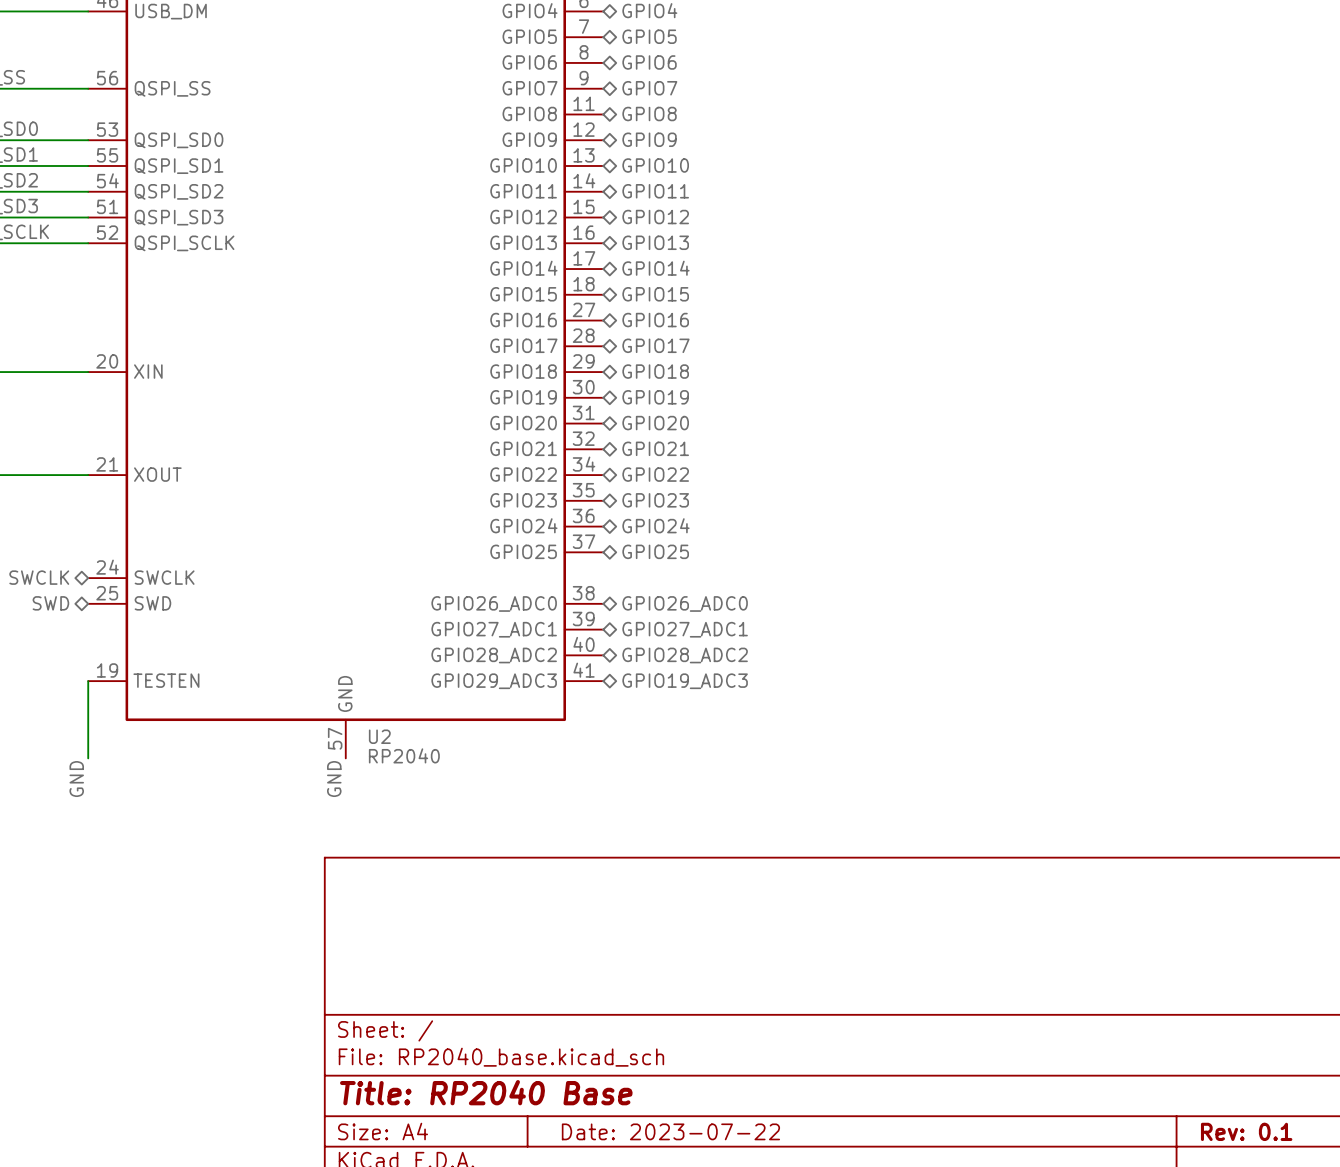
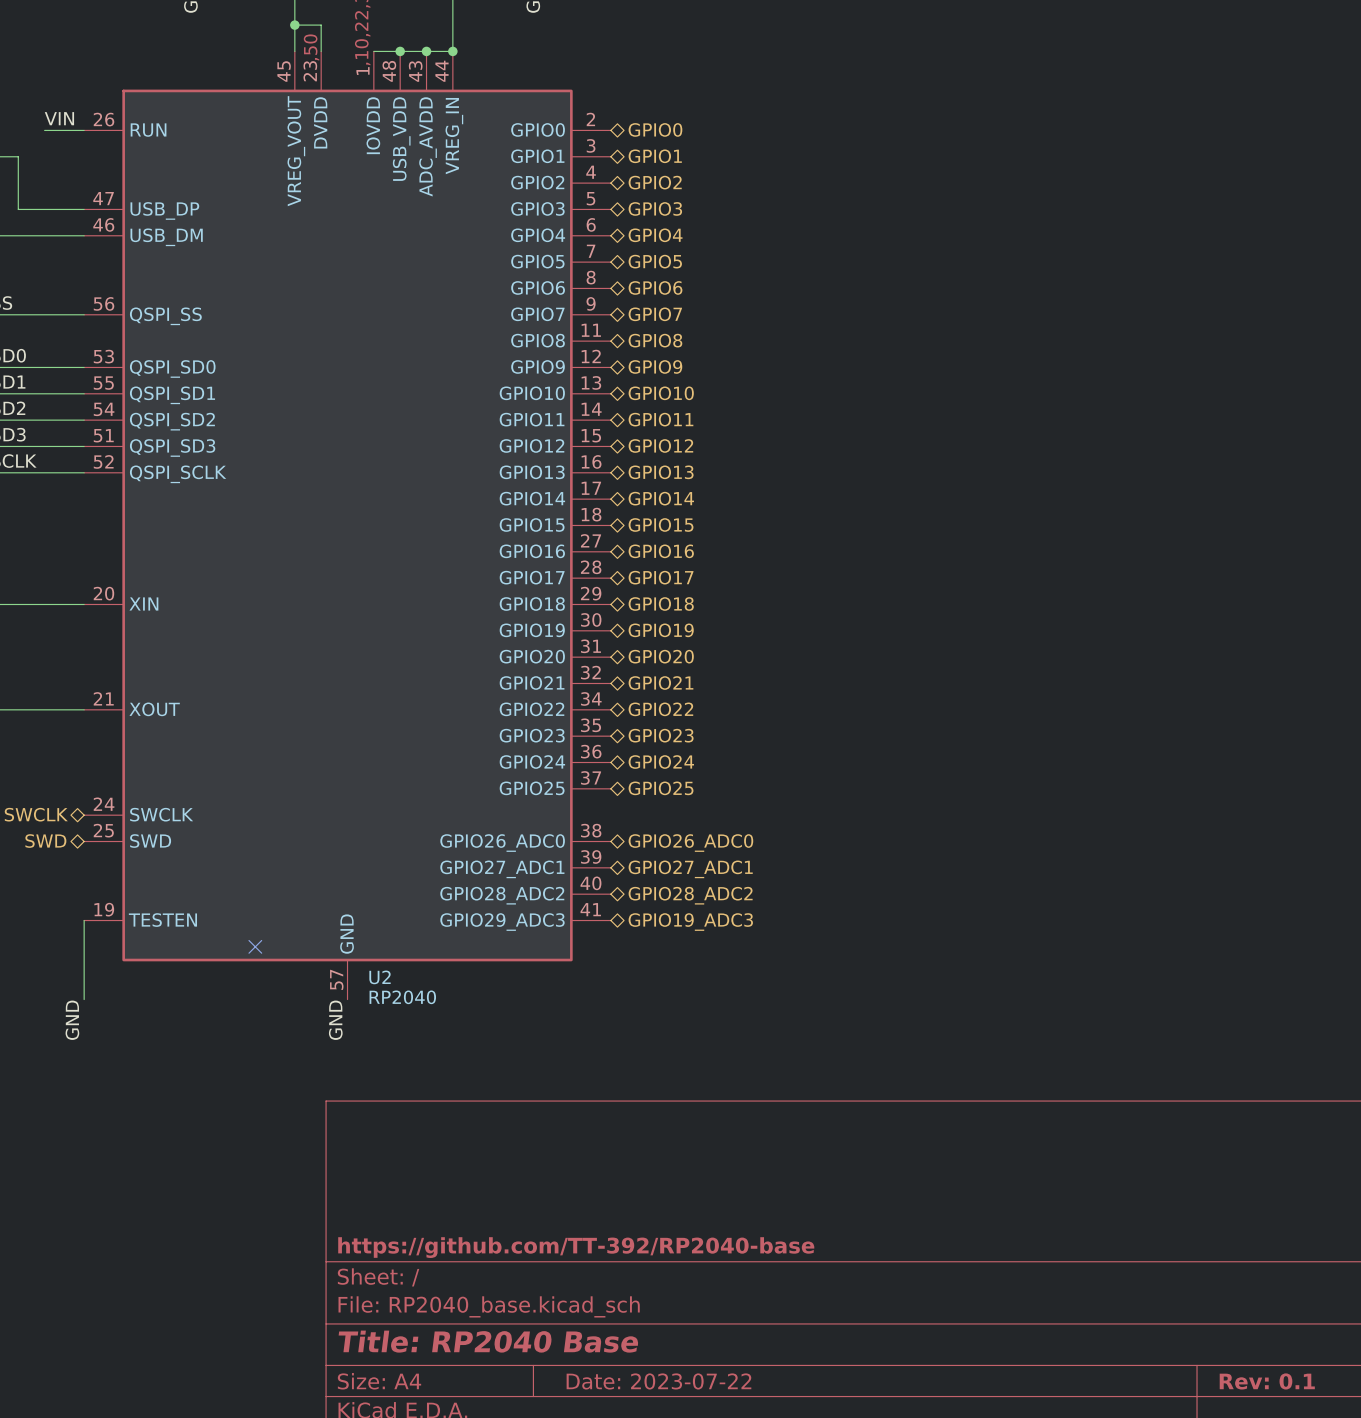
no-connect mark: none -> (255, 946)
title block: none -> https://github.com/TT-392/RP2040-base (576, 1247)

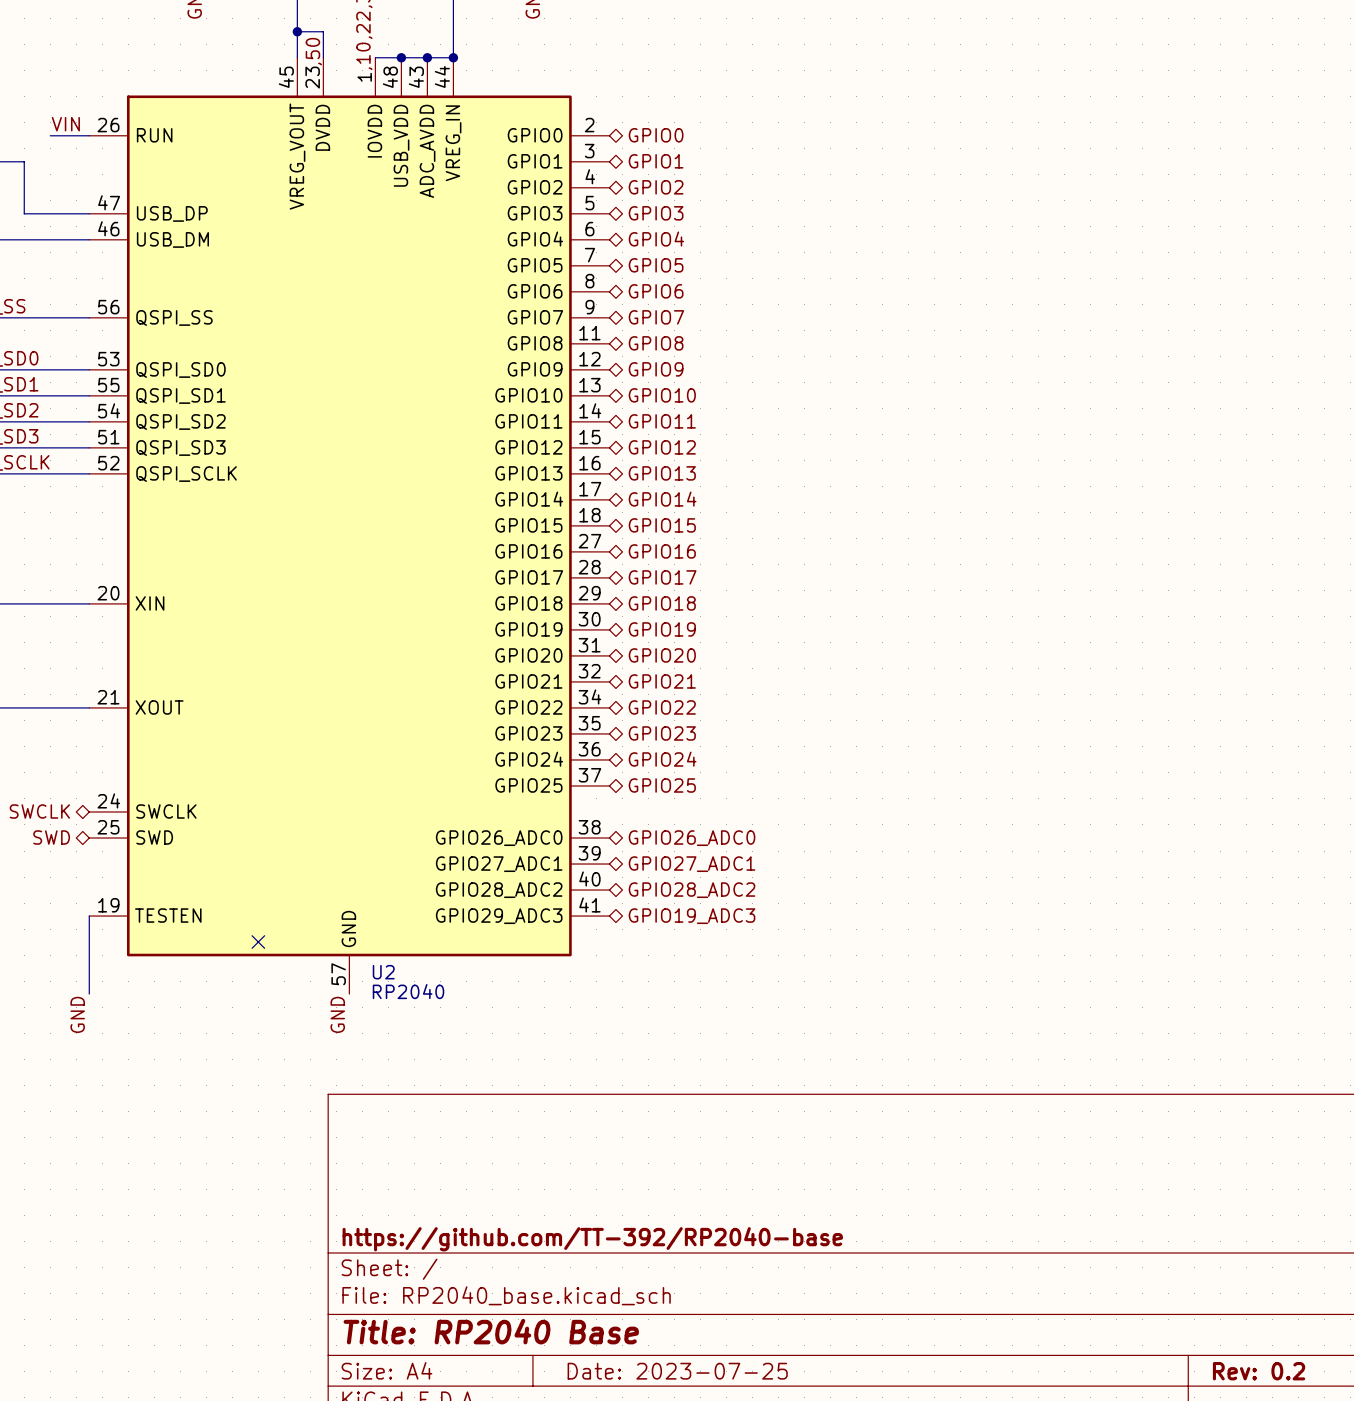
title block: Date: 2023-07-22 (658, 1381) -> Date: 2023-07-25 (677, 1371)
title block: Rev: 0.1 (1267, 1381) -> Rev: 0.2 (1259, 1371)

